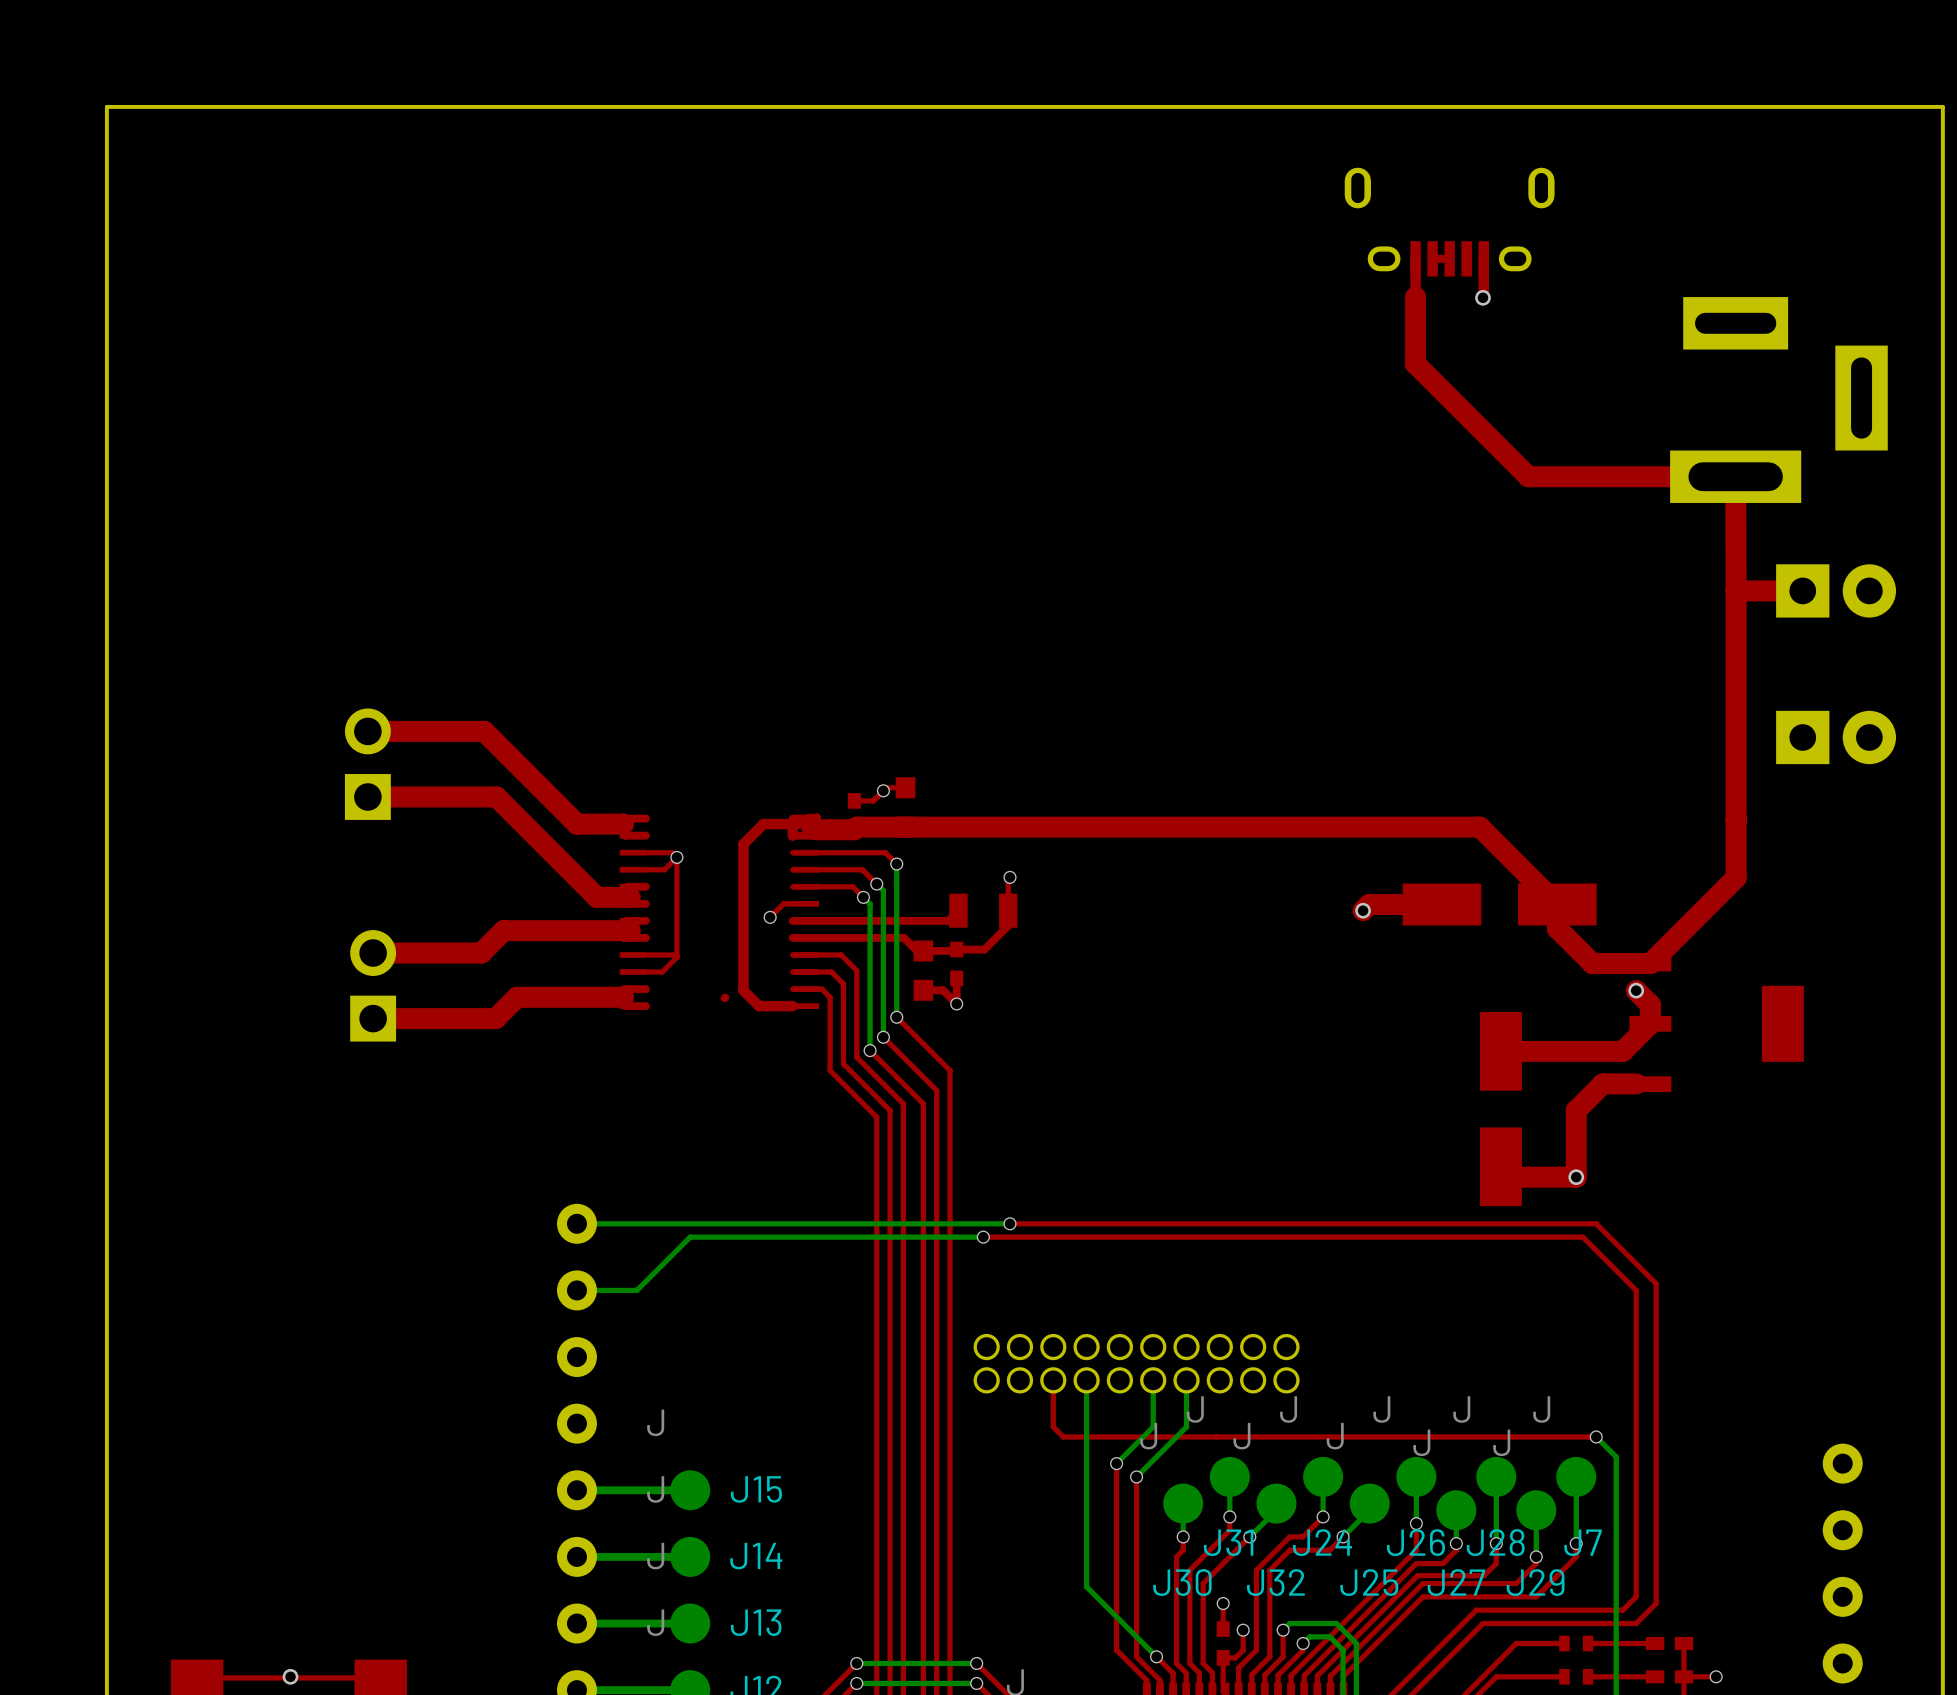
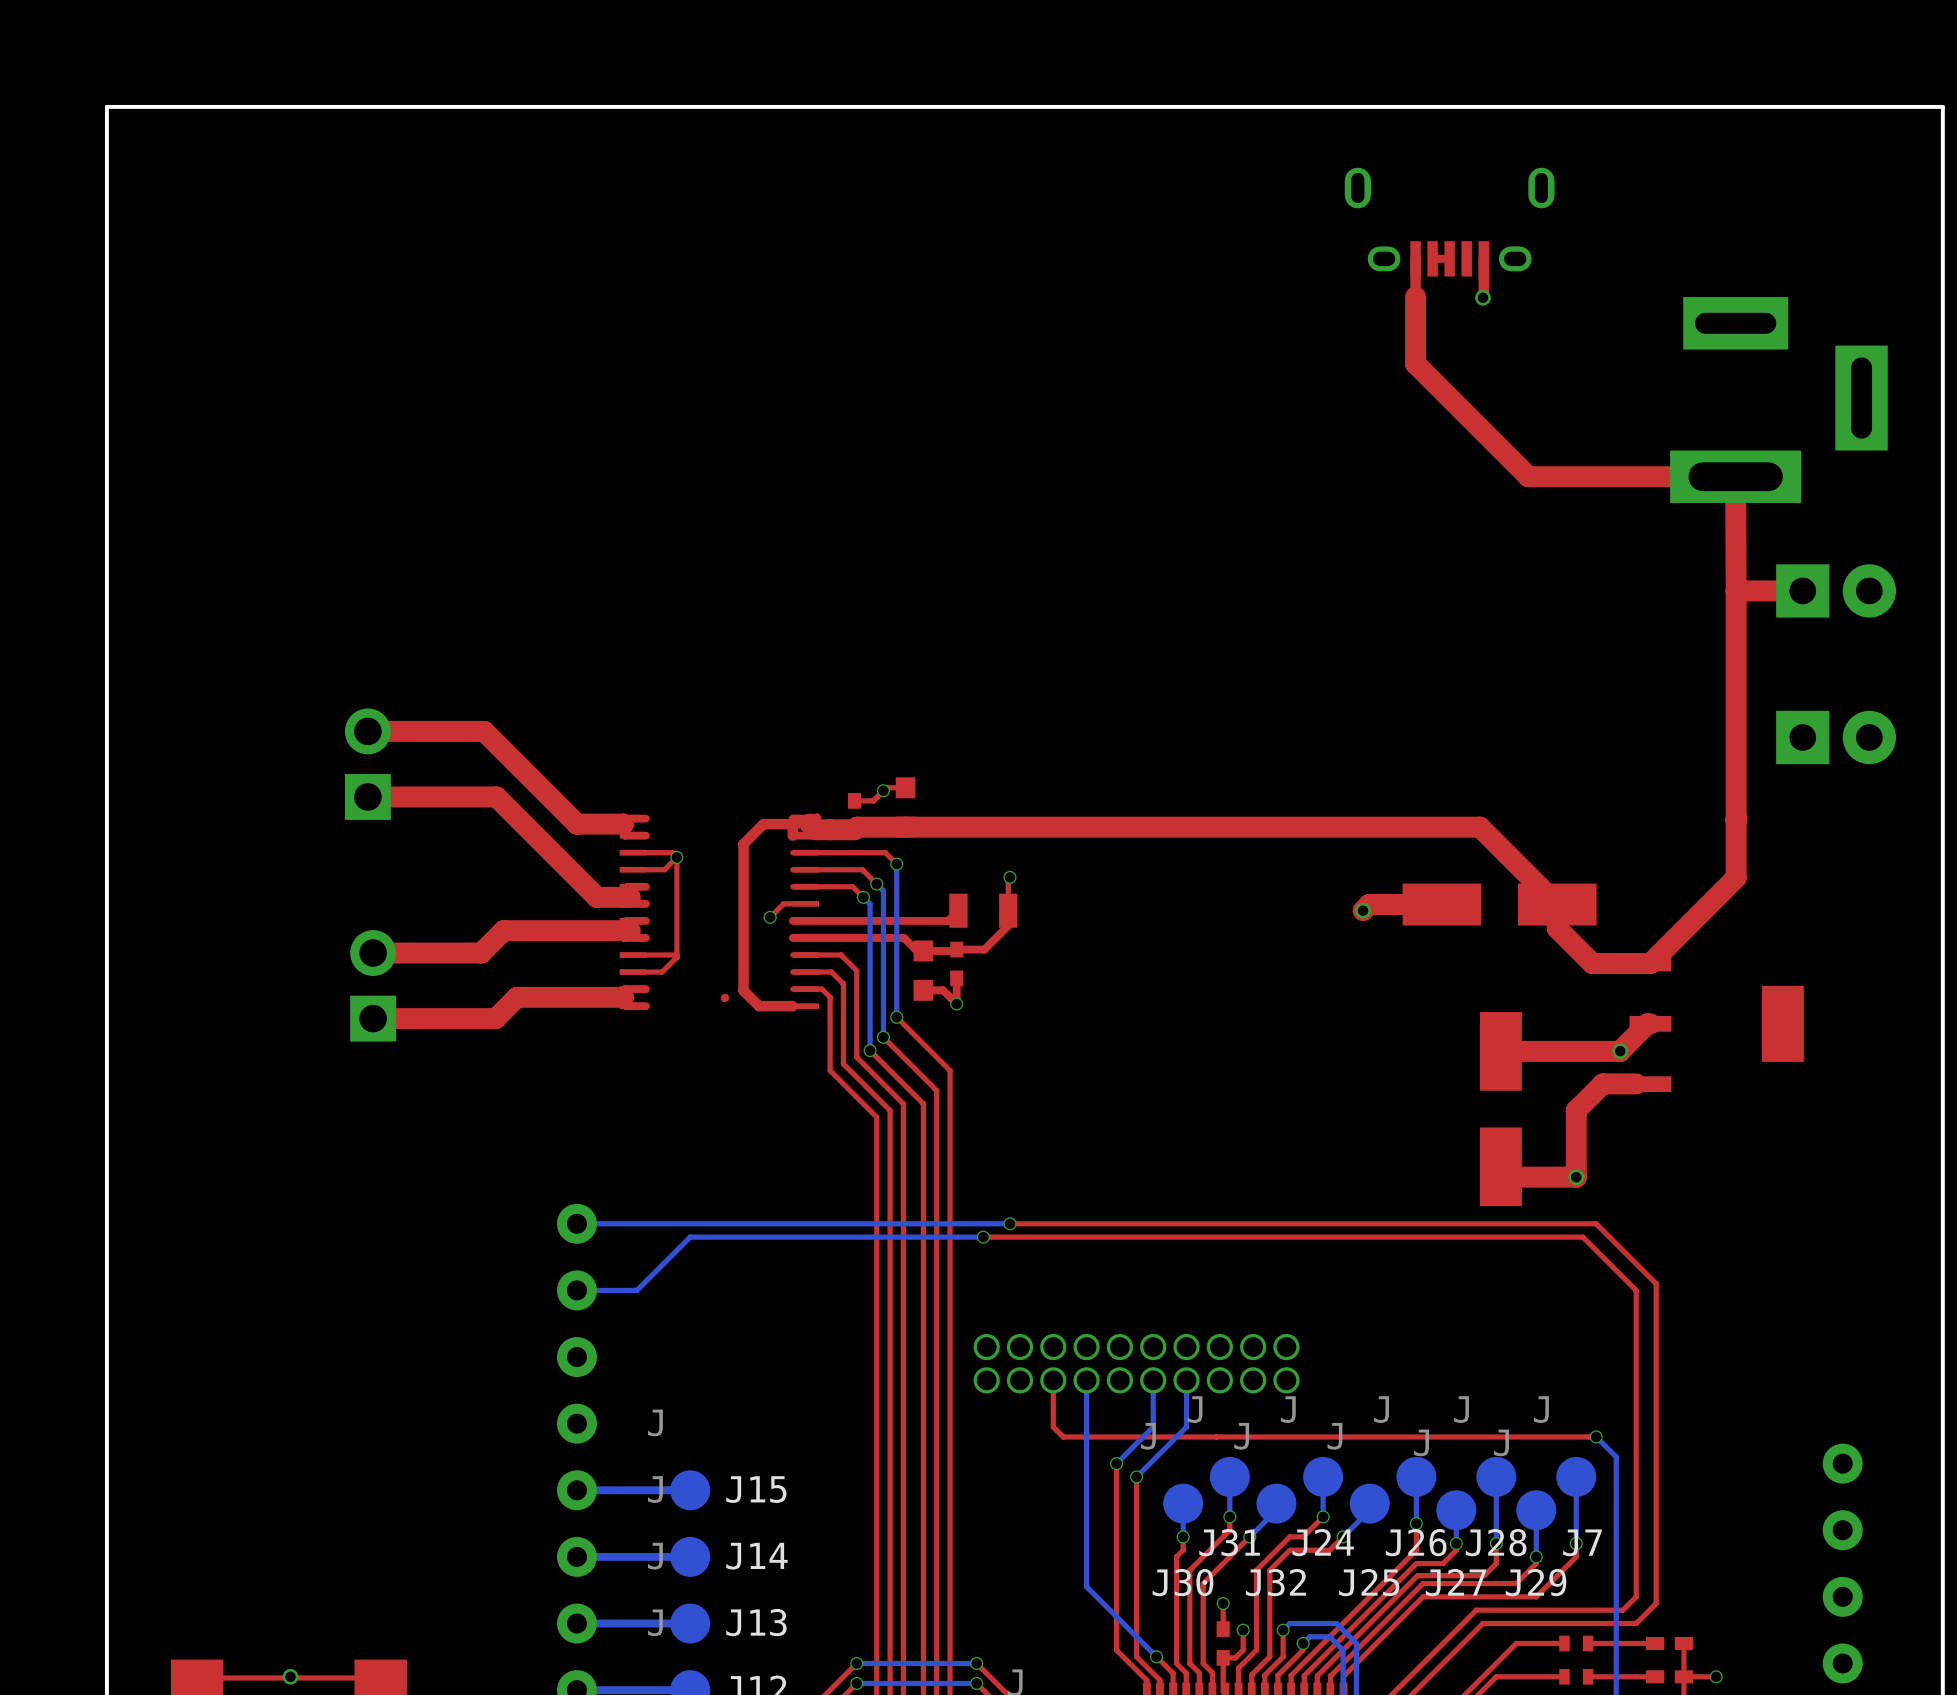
top track: (1636, 990) (1650, 1004) (1650, 1023) (1622, 1051) (1619, 1051) -> (1650, 1023) (1647, 1023) (1619, 1051)
via position: (1636, 990) -> (1620, 1051)

